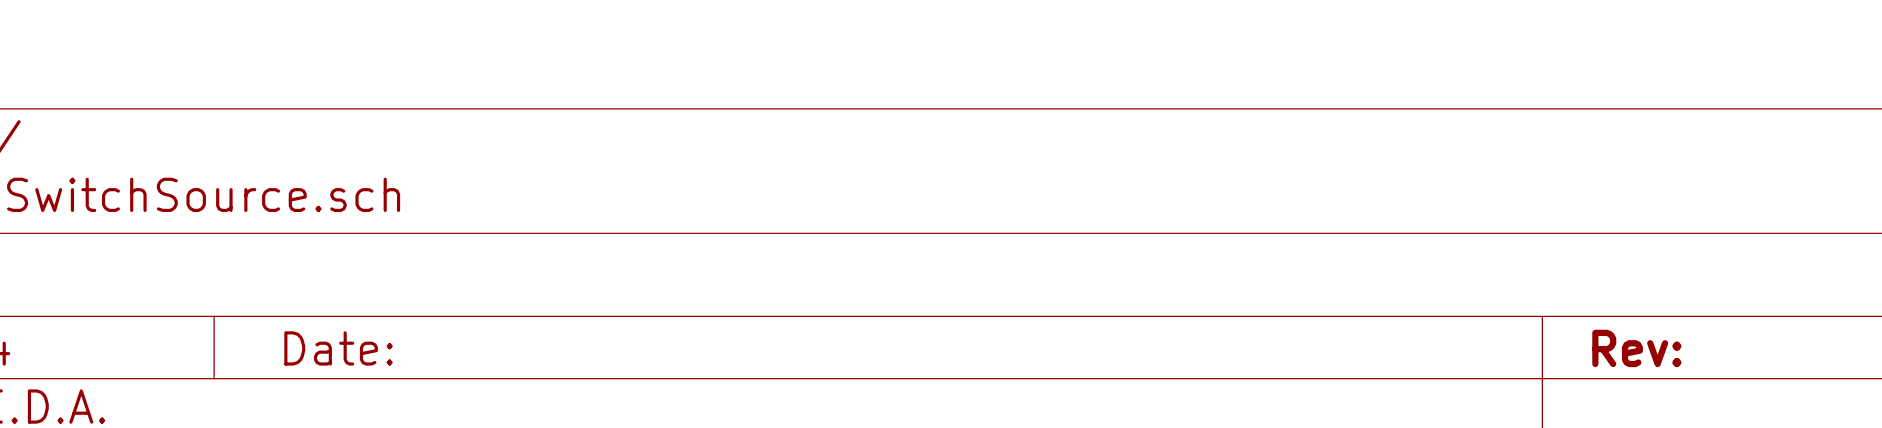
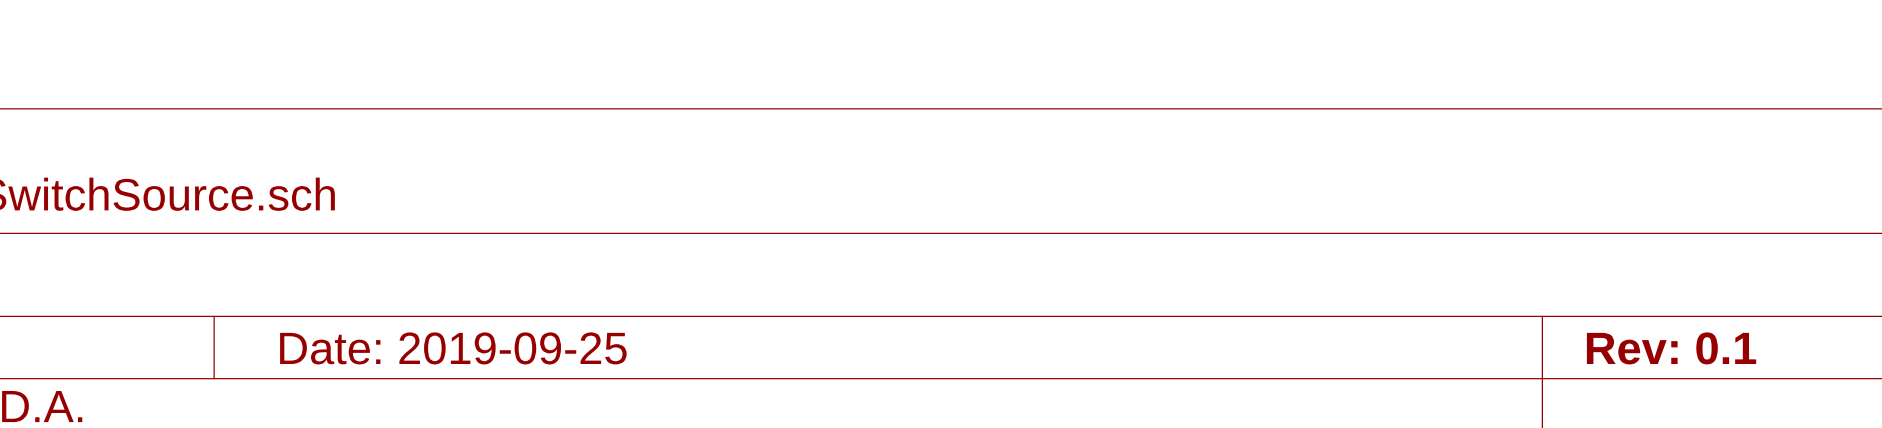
title block: Date: (338, 348) -> Date: 2019-09-25 (453, 348)
title block: Rev: (1636, 348) -> Rev: 0.1 (1671, 348)

